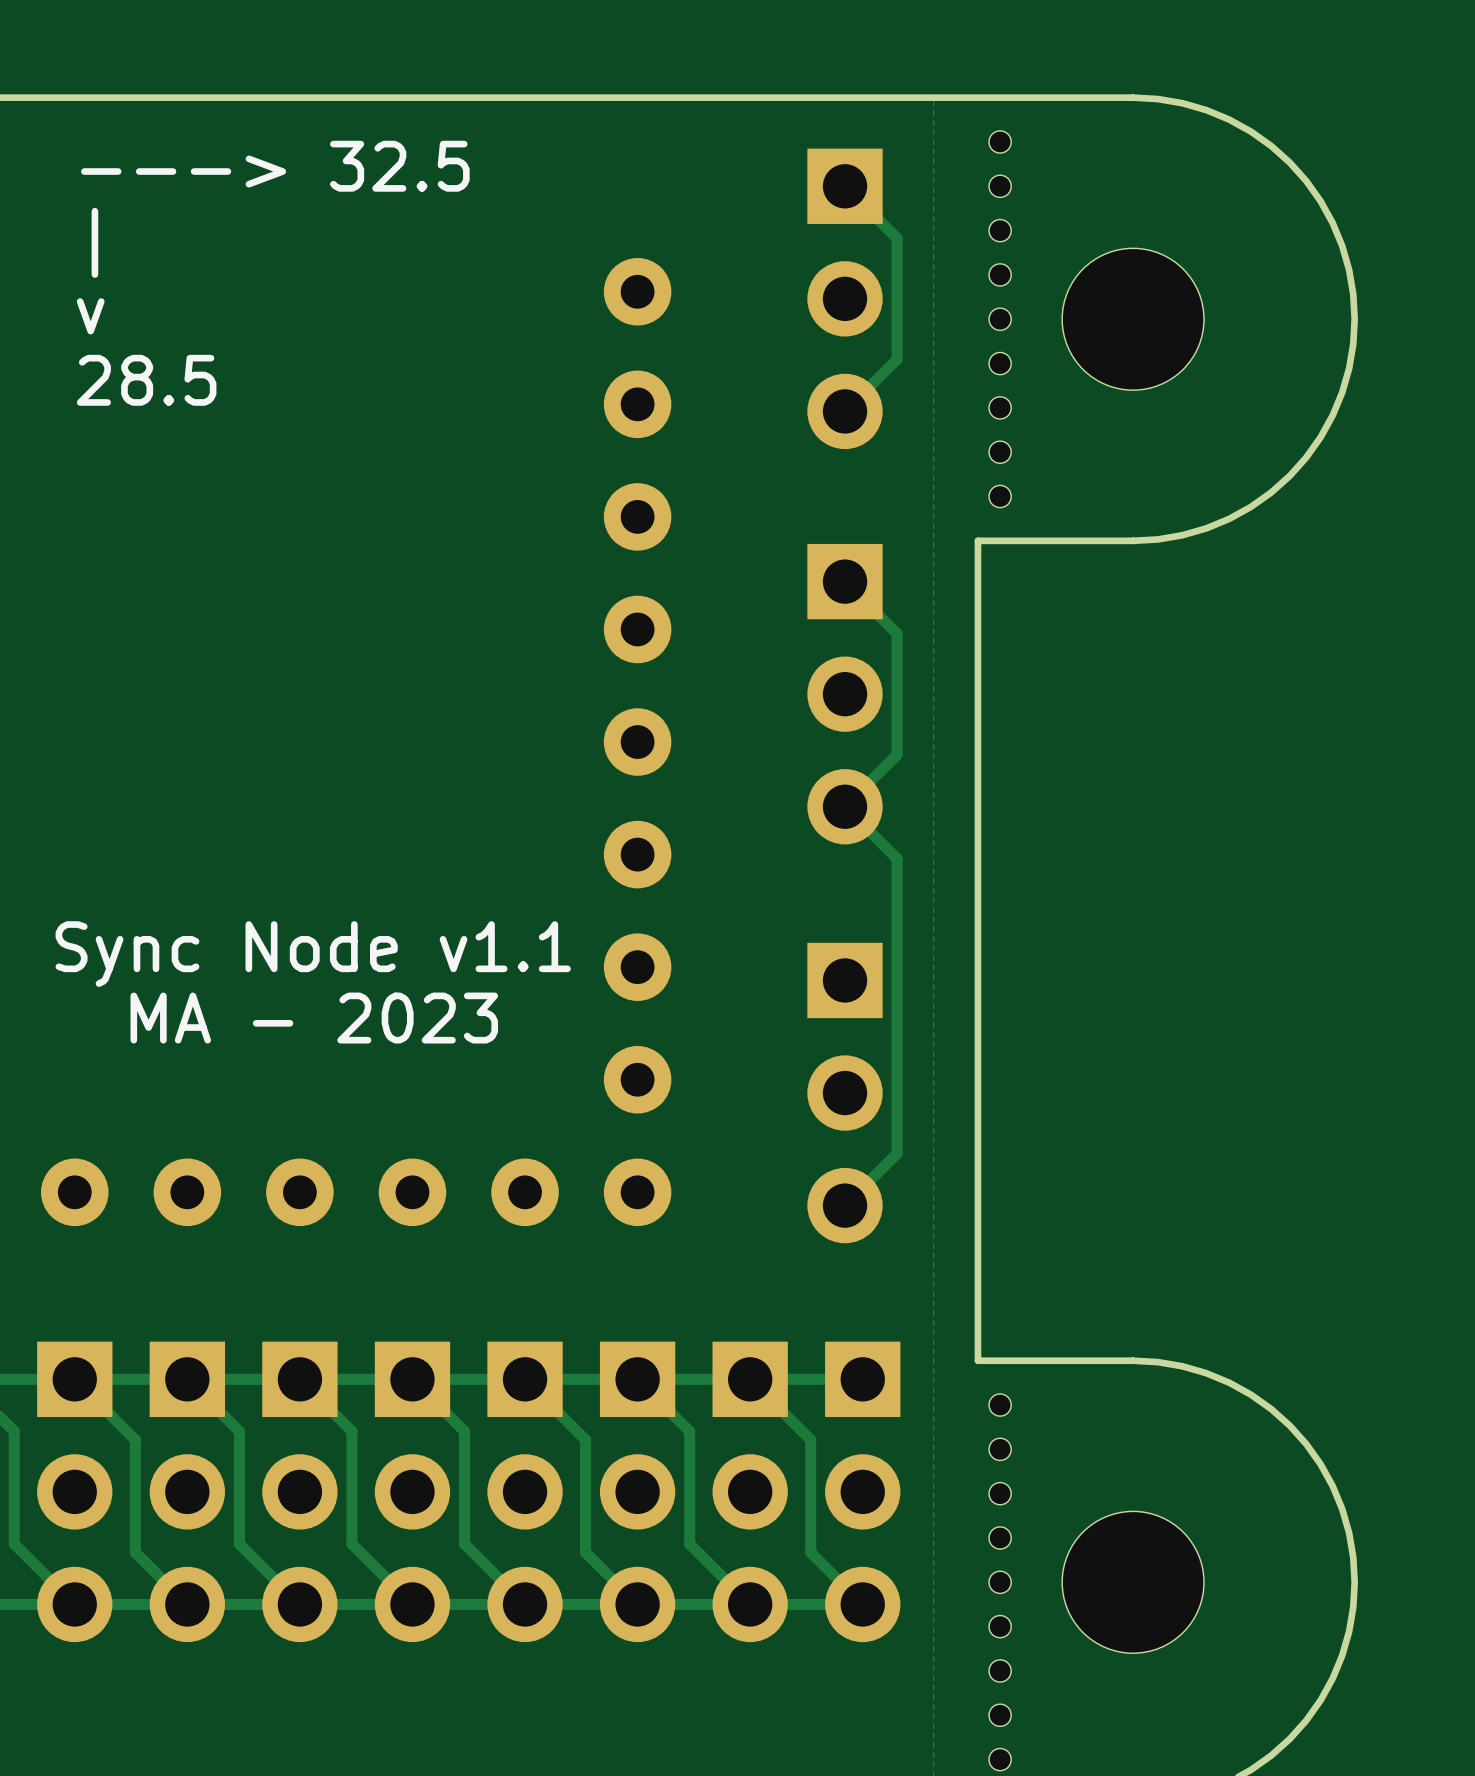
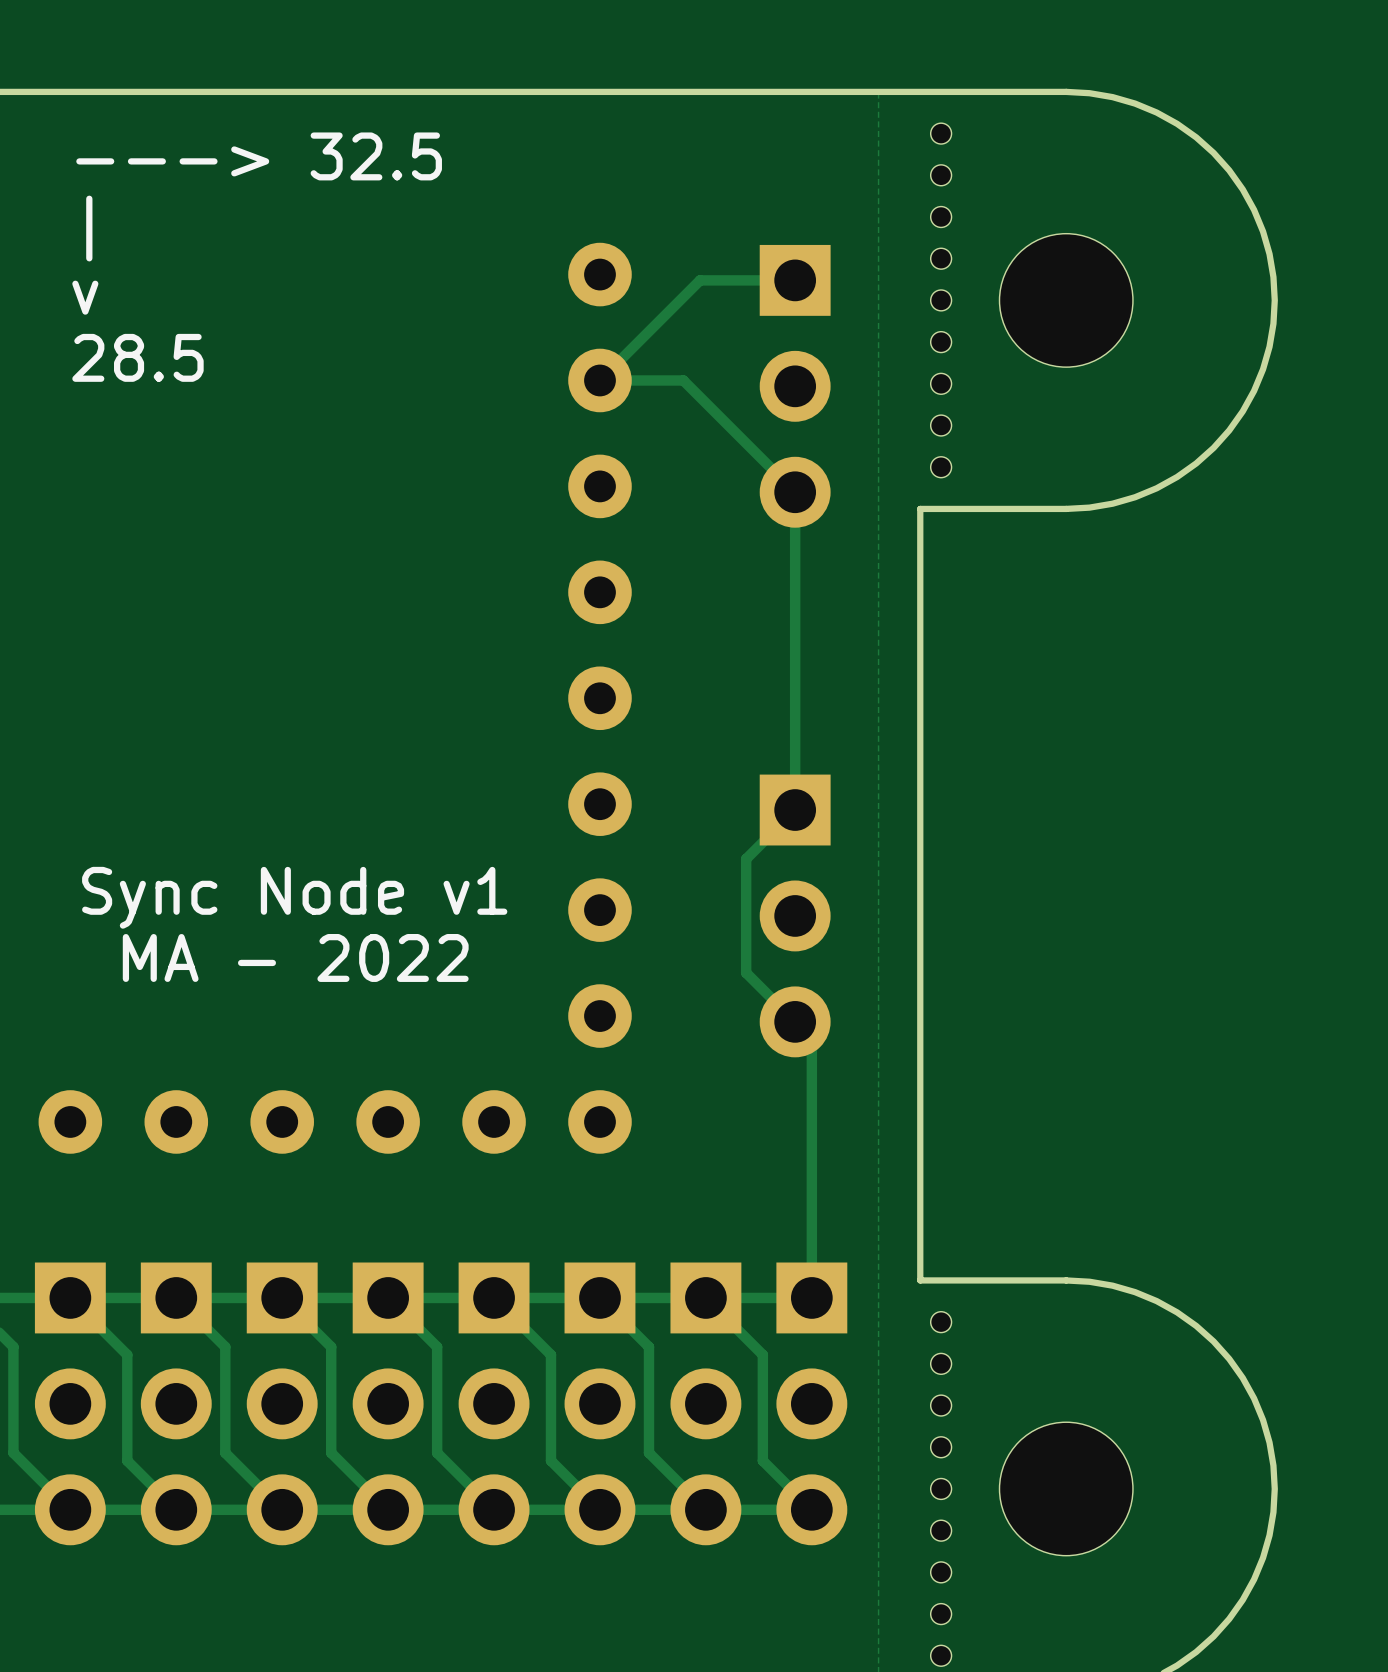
track: (845, 186) (897, 238) (897, 359) (845, 411) -> none
track: none -> (795, 280) (700, 280) (599, 380) (683, 380) (795, 492) (795, 810) (746, 859) (746, 972) (811, 1038) (811, 1297)
part position: (845, 298) -> (795, 386)
track: (845, 581) (897, 633) (897, 754) (845, 806) (897, 858) (897, 1153) (845, 1205) -> none
part: (845, 694) -> none
text: Sync Node v1.1 (313, 954) -> Sync Node v1 (294, 897)
text: MA - 2023 (314, 1018) -> MA - 2022 (295, 957)
part position: (845, 1093) -> (795, 915)

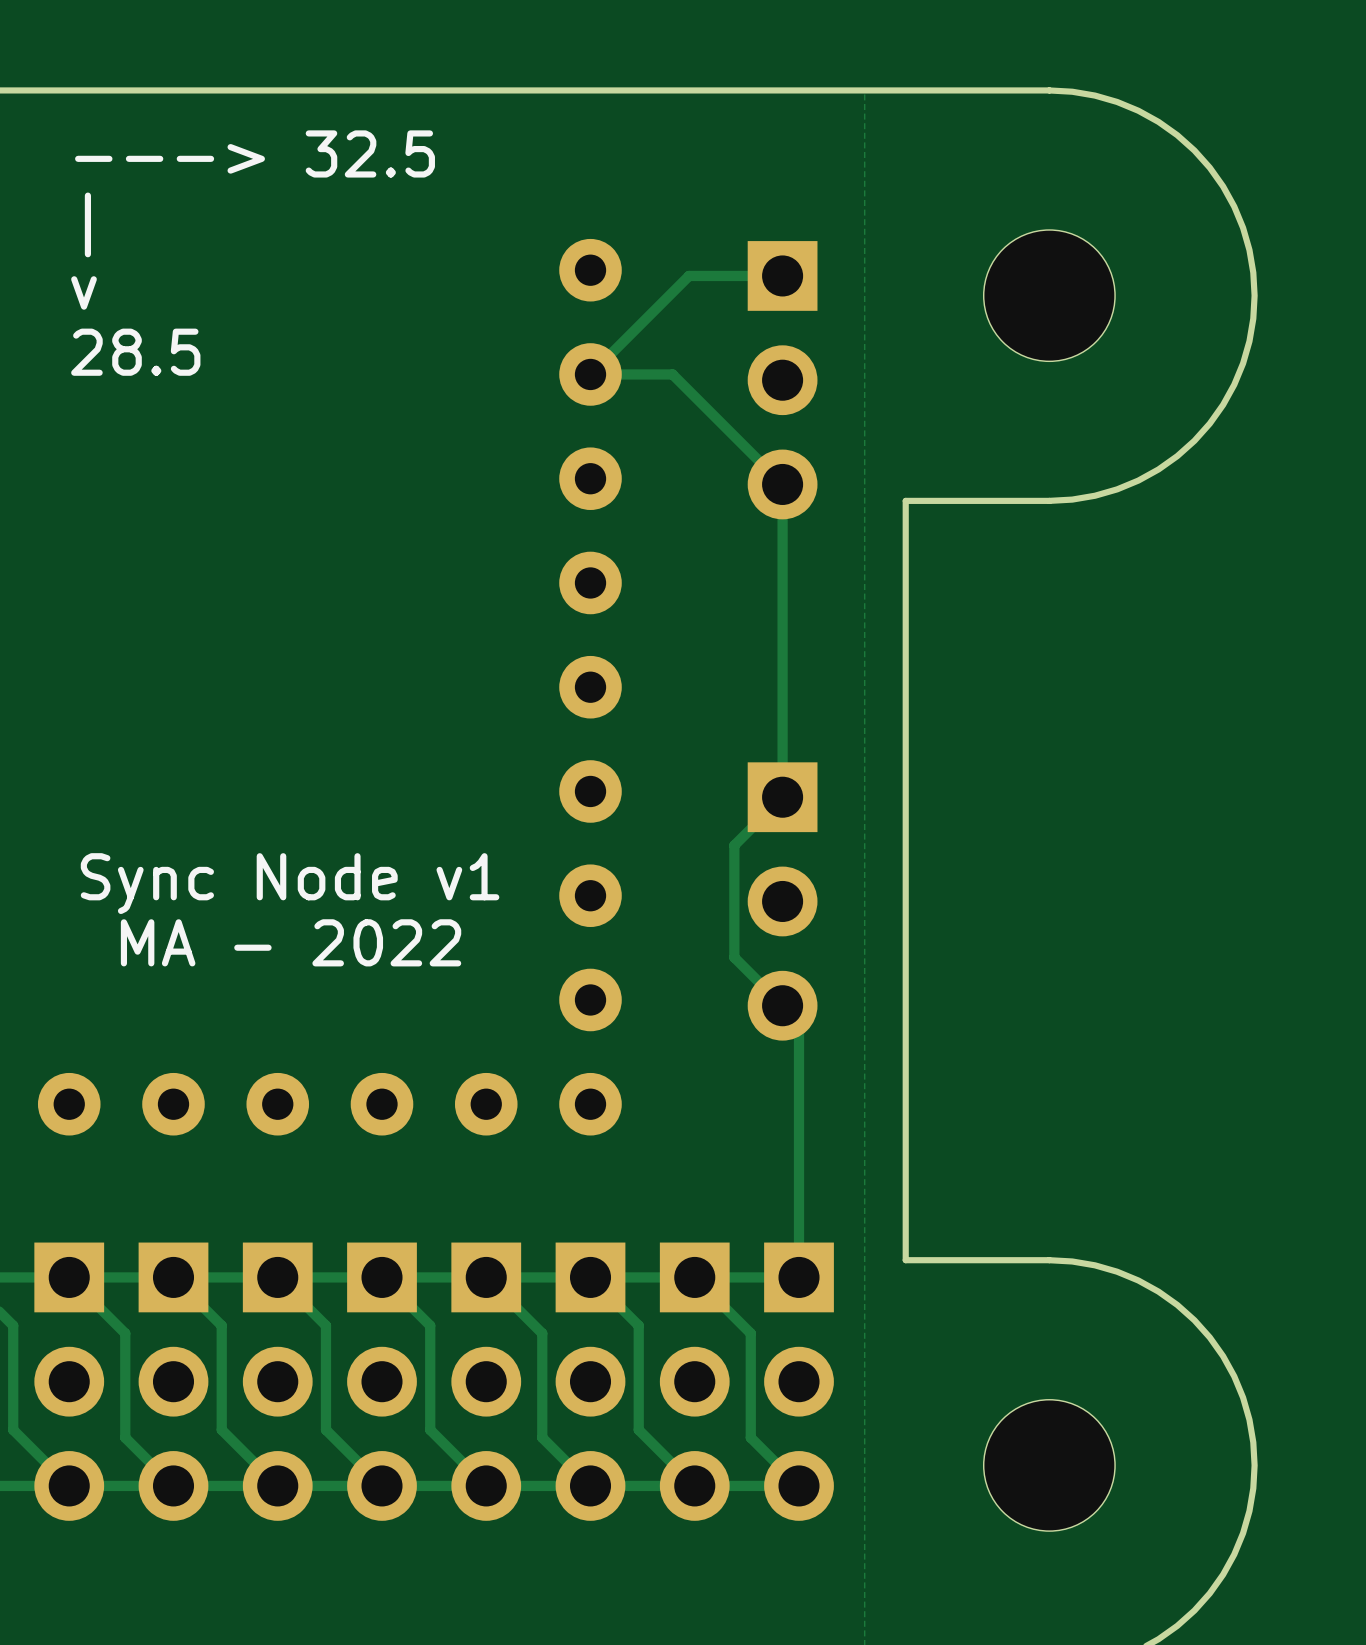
part: (941, 175) -> none
part: (941, 300) -> none
part: (941, 425) -> none
part: (941, 1363) -> none
part: (941, 1488) -> none
part: (941, 1614) -> none

